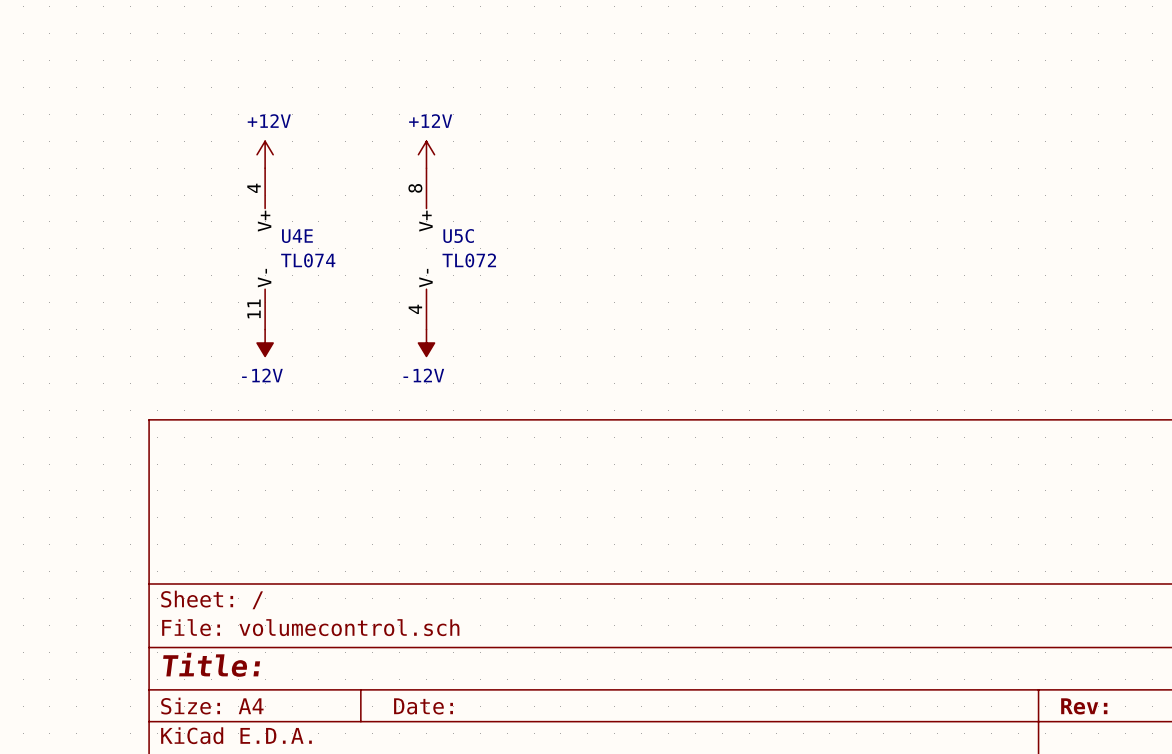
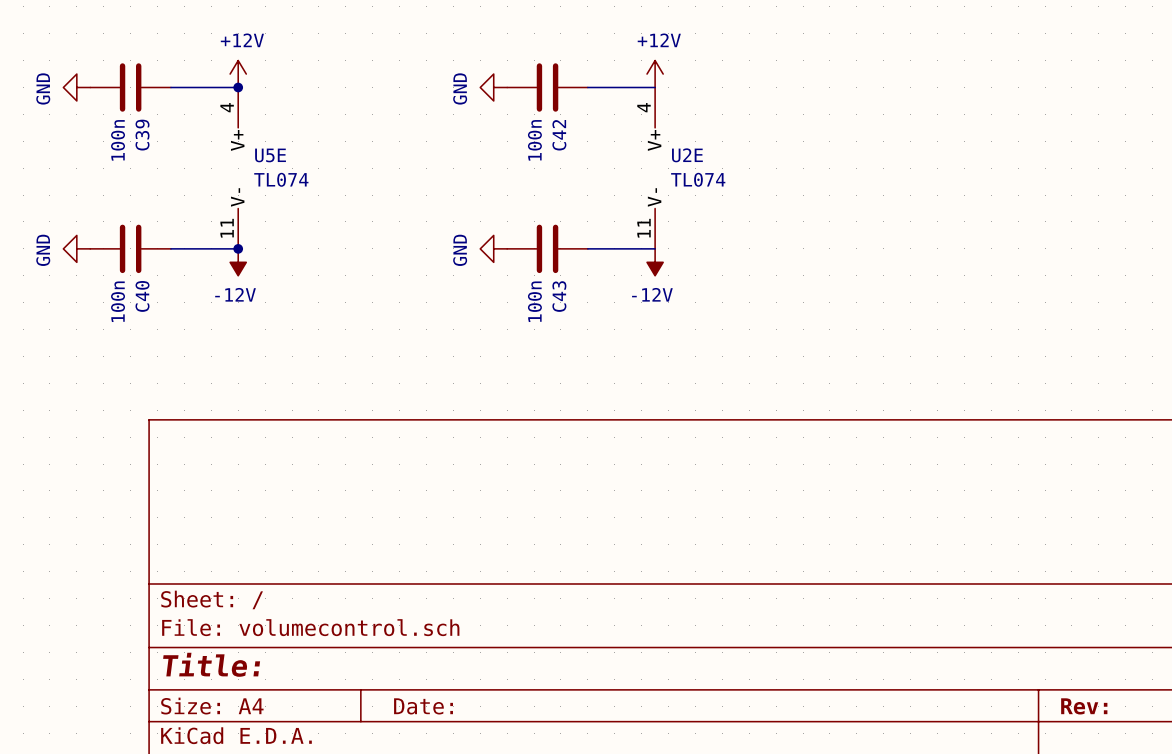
power symbol: none -> +12V (655, 74)
power symbol: none -> GND (76, 87)
C39: none -> 100n (130, 87)
wire: none -> (170, 87) (238, 87)
junction: none -> (238, 87)
power symbol: none -> GND (493, 87)
C42: none -> 100n (547, 87)
wire: none -> (587, 87) (655, 87)
power symbol position: +12V (265, 154) -> +12V (238, 74)
power symbol: +12V (426, 154) -> none
U5E: none -> TL074 (238, 168)
U2E: none -> TL074 (655, 168)
power symbol: none -> GND (76, 248)
C40: none -> 100n (130, 248)
wire: none -> (170, 248) (238, 248)
junction: none -> (238, 248)
U4E: TL074 (265, 248) -> none
U5C: TL072 (426, 248) -> none
power symbol: none -> GND (493, 248)
C43: none -> 100n (547, 248)
wire: none -> (587, 248) (655, 248)
power symbol: none -> -12V (655, 262)
power symbol position: -12V (265, 343) -> -12V (238, 262)
power symbol: -12V (426, 343) -> none

